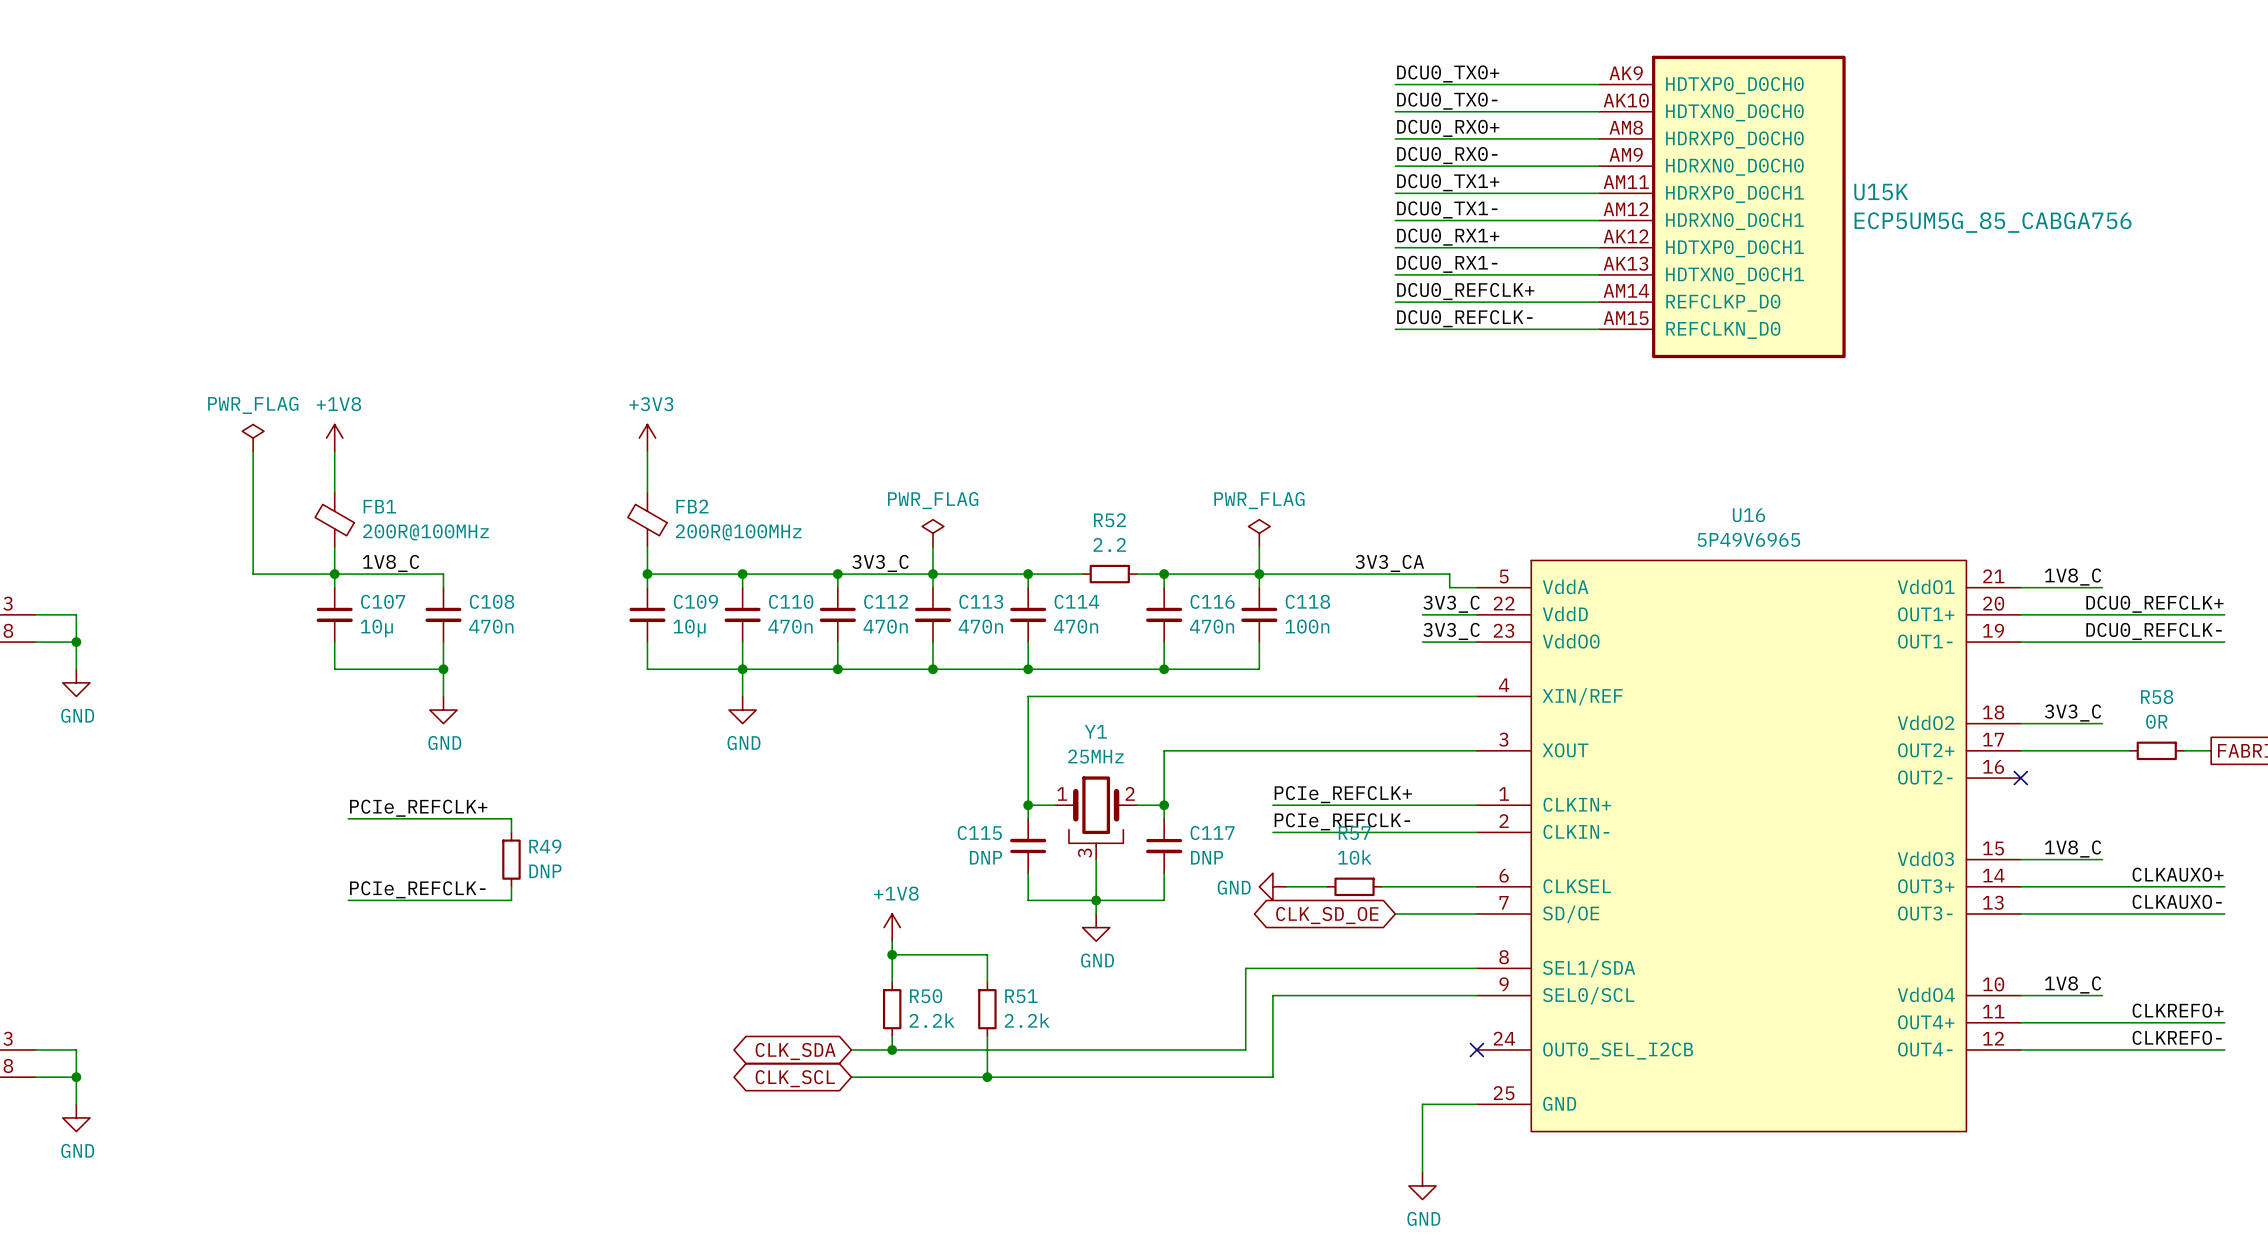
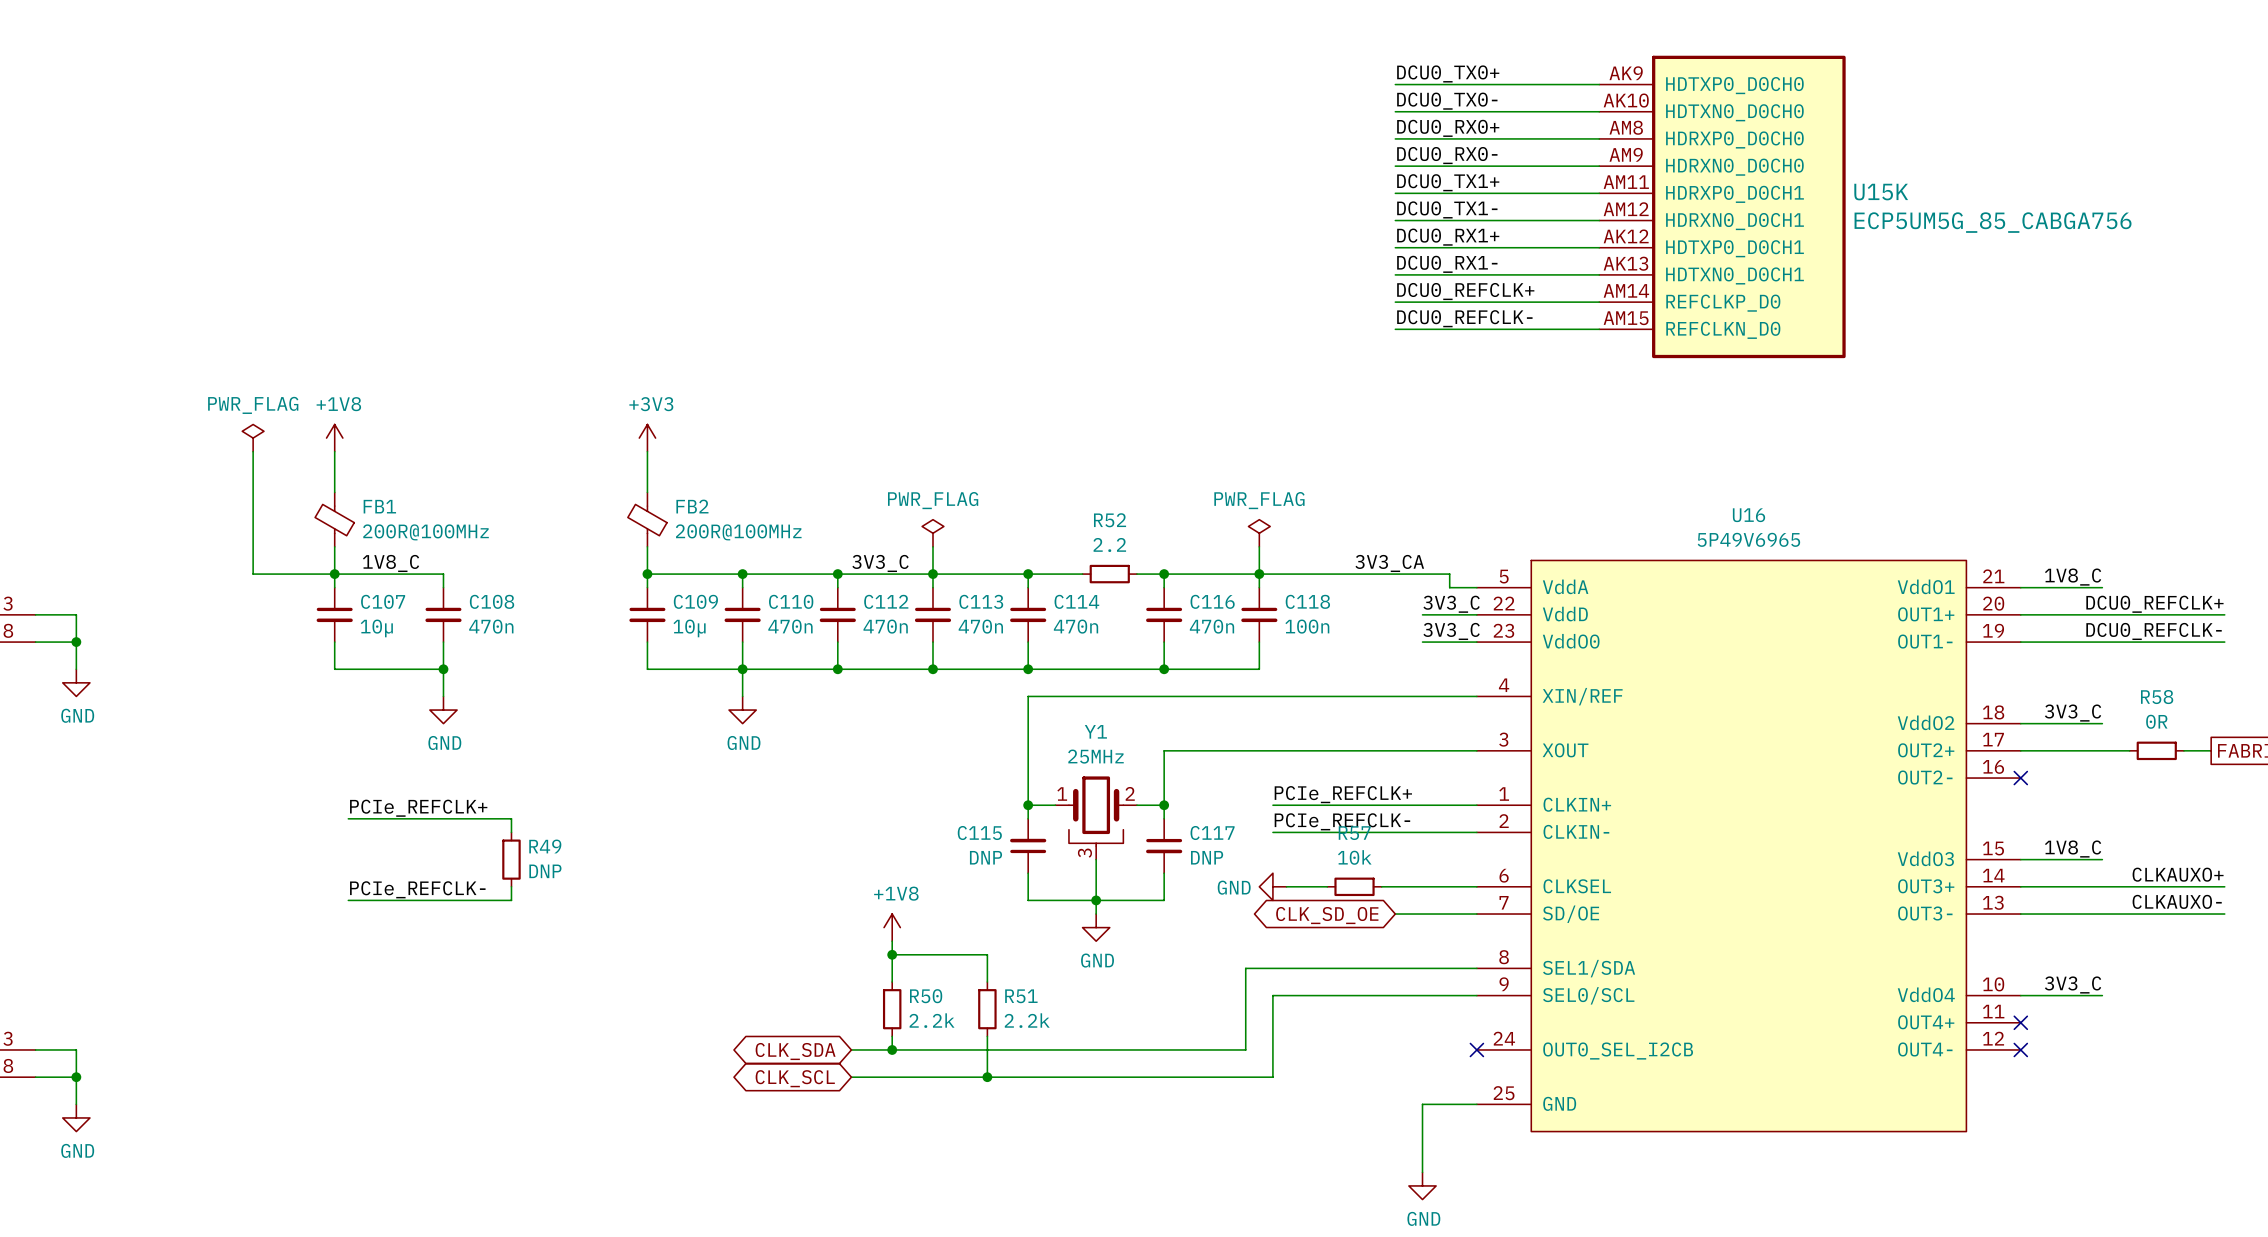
label: 1V8_C (2073, 984) -> 3V3_C (2073, 984)
label: CLKREFO+ (2178, 1010) -> none
wire: (2020, 1022) (2224, 1022) -> none
no-connect mark: none -> (2020, 1022)
label: CLKREFO- (2177, 1037) -> none
wire: (2020, 1049) (2224, 1049) -> none
no-connect mark: none -> (2020, 1049)

